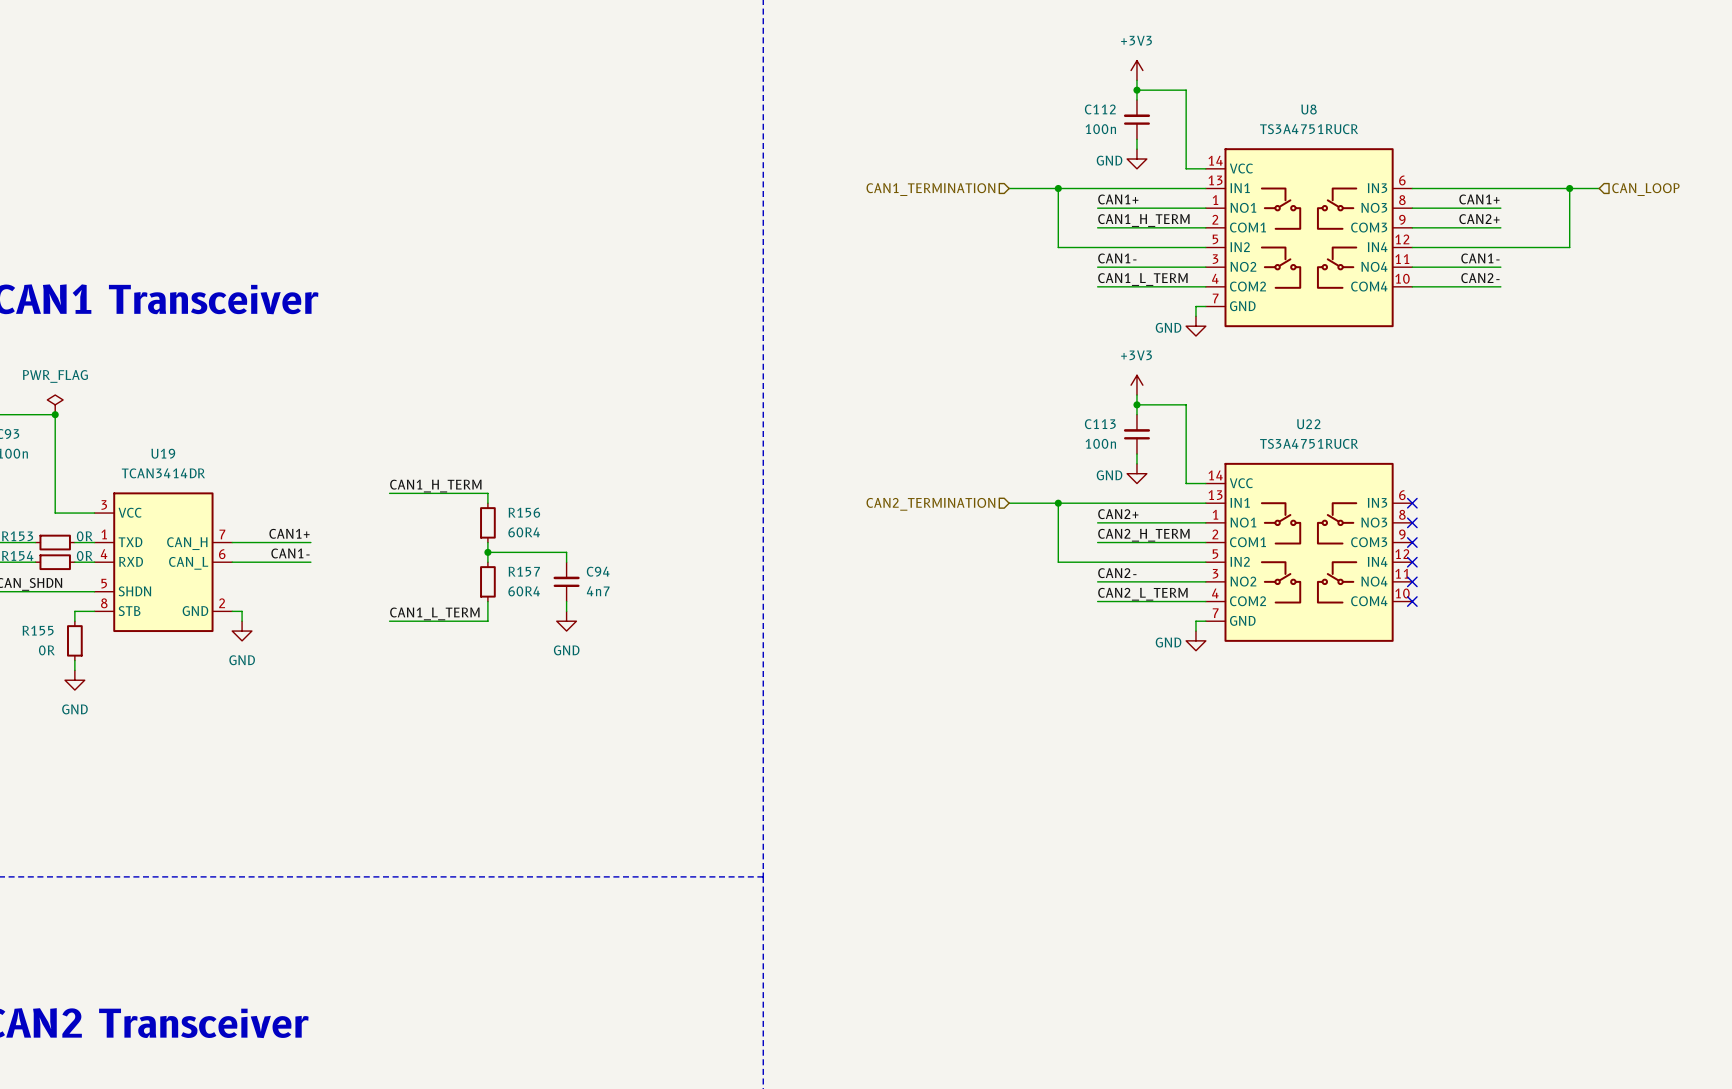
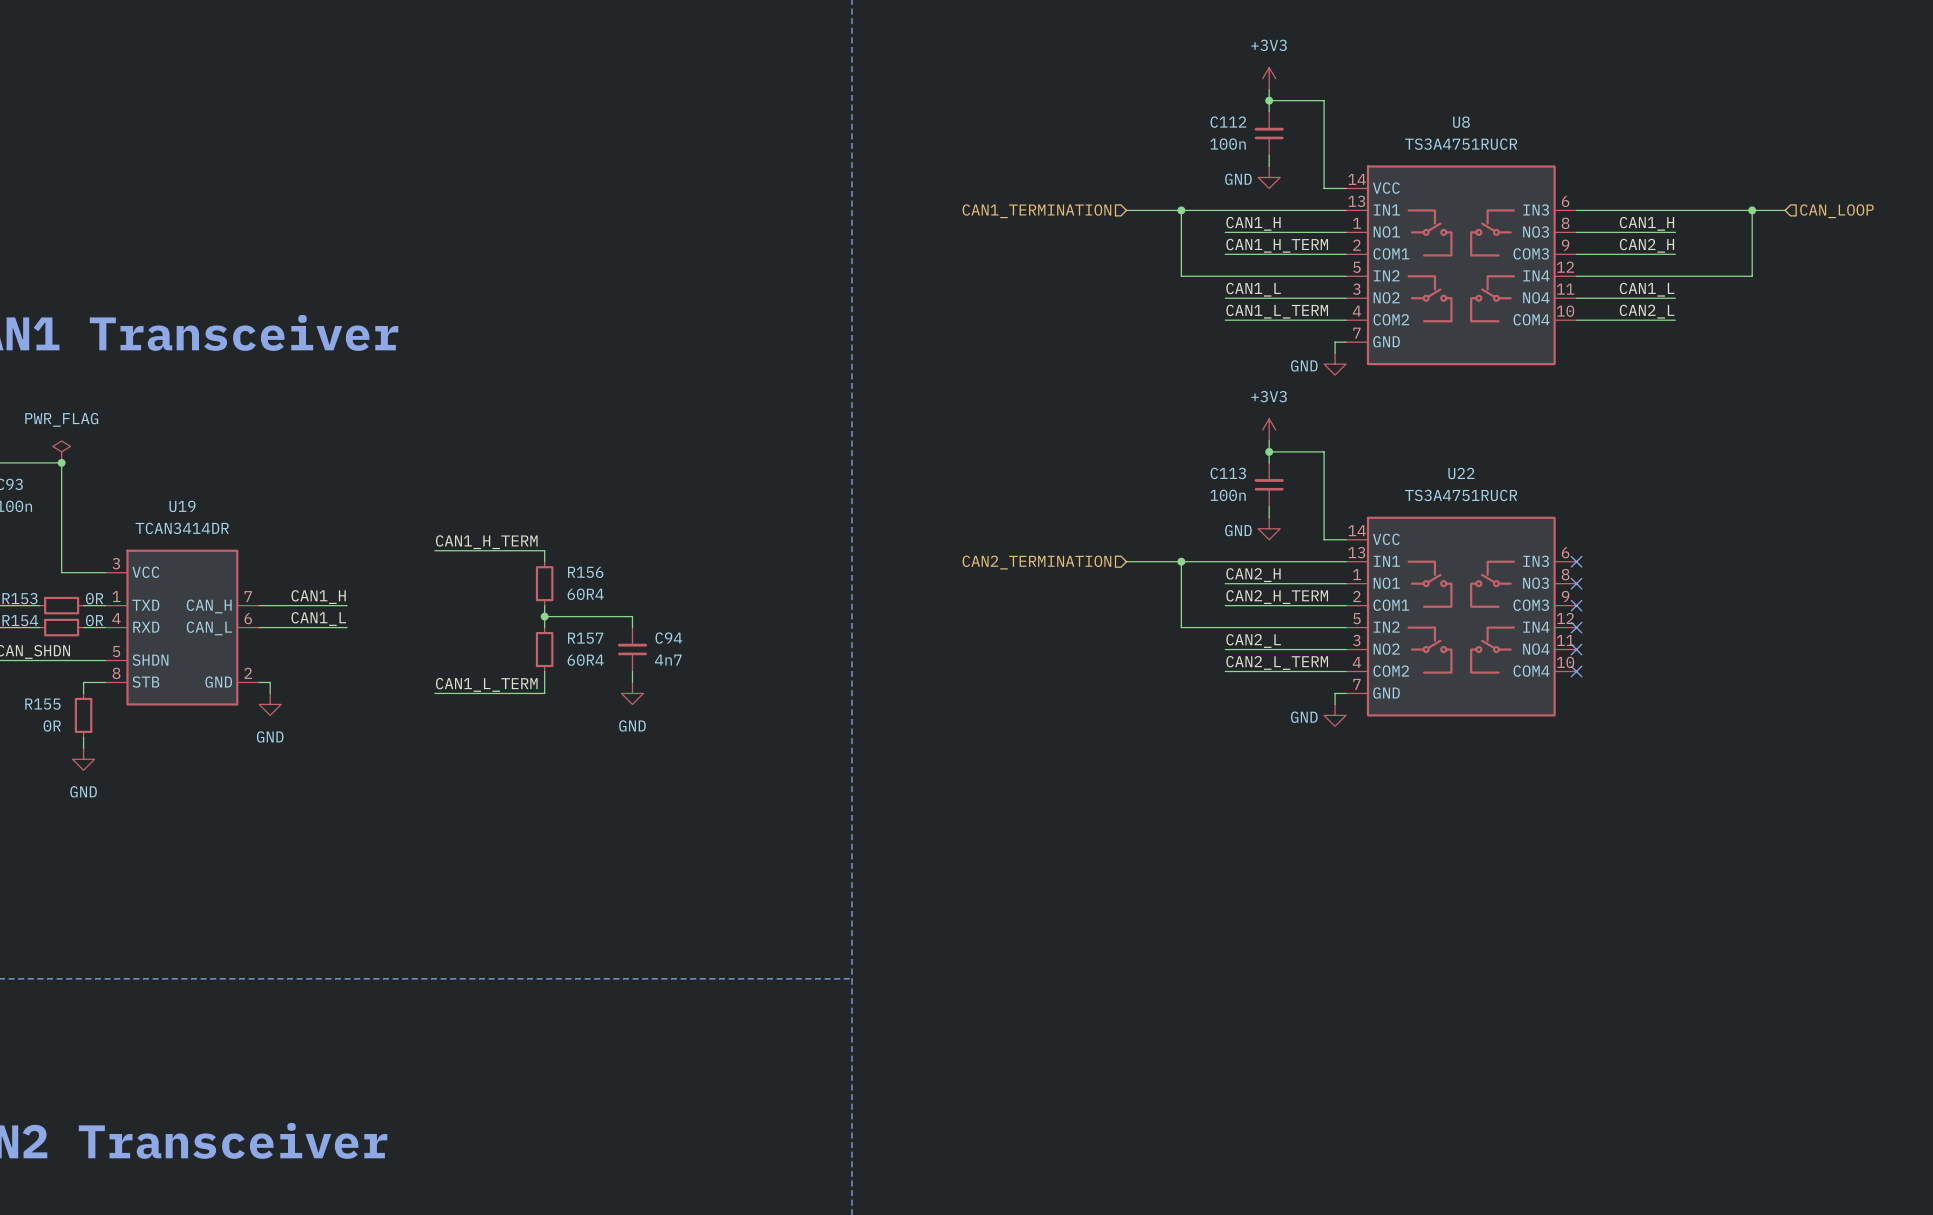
label: CAN1+ (1118, 199) -> CAN1_H (1253, 223)
label: CAN1+ (1479, 199) -> CAN1_H (1646, 223)
label: CAN2+ (1479, 219) -> CAN2_H (1646, 245)
label: CAN1- (1117, 258) -> CAN1_L (1253, 289)
label: CAN1- (1480, 258) -> CAN1_L (1647, 289)
label: CAN2- (1480, 278) -> CAN2_L (1647, 311)
label: CAN2+ (1118, 514) -> CAN2_H (1253, 575)
label: CAN1+ (289, 533) -> CAN1_H (318, 597)
label: CAN1- (290, 553) -> CAN1_L (318, 619)
label: CAN2- (1117, 573) -> CAN2_L (1253, 640)

